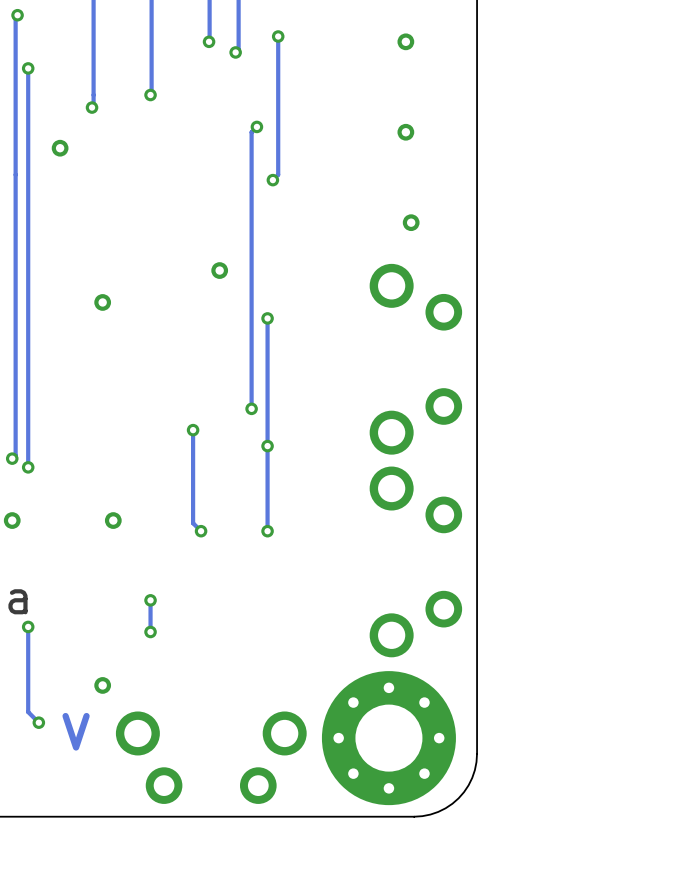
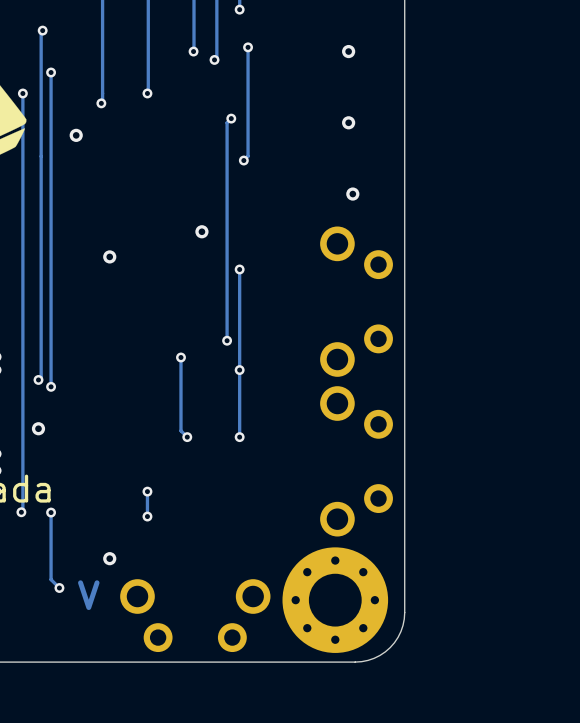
via: (113, 520) -> none

